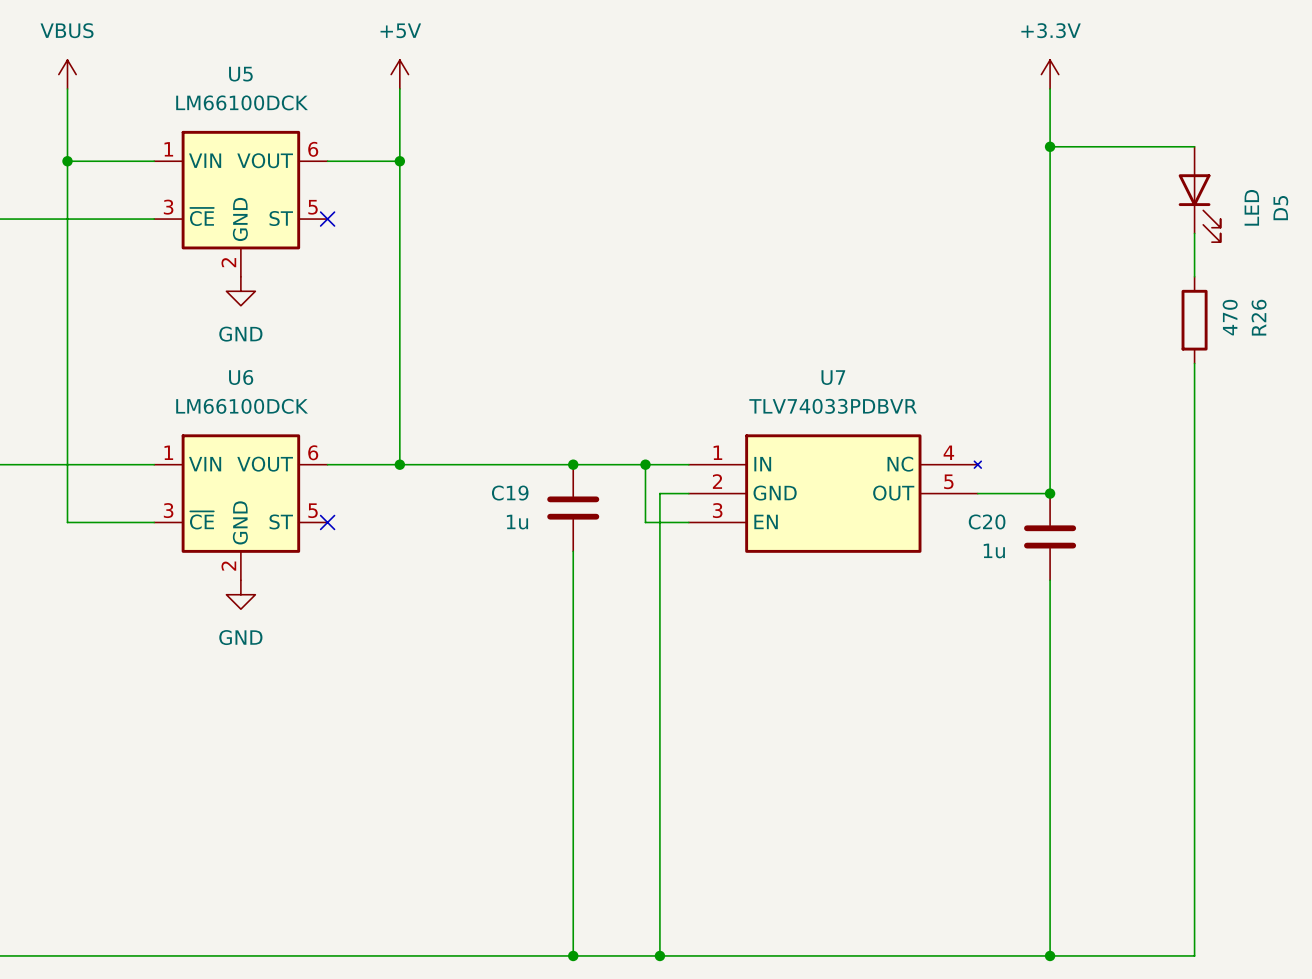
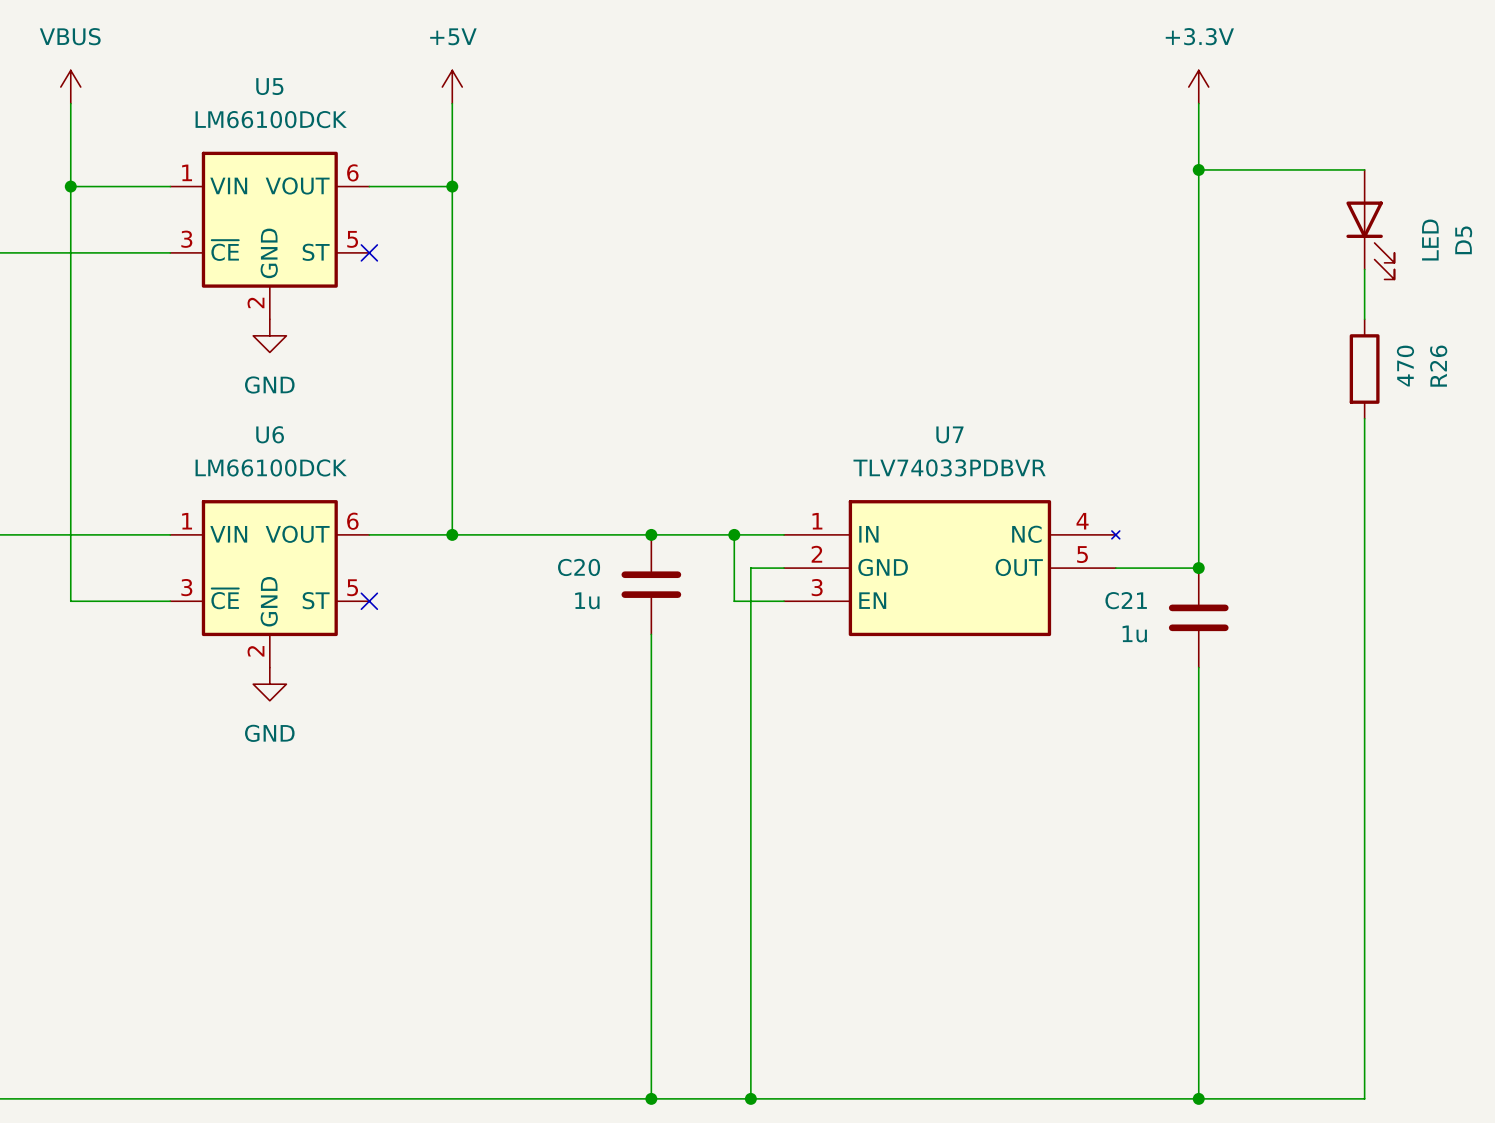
C19 name: C19 (510, 493) -> C20 (579, 567)
C20 name: C20 (987, 521) -> C21 (1126, 600)

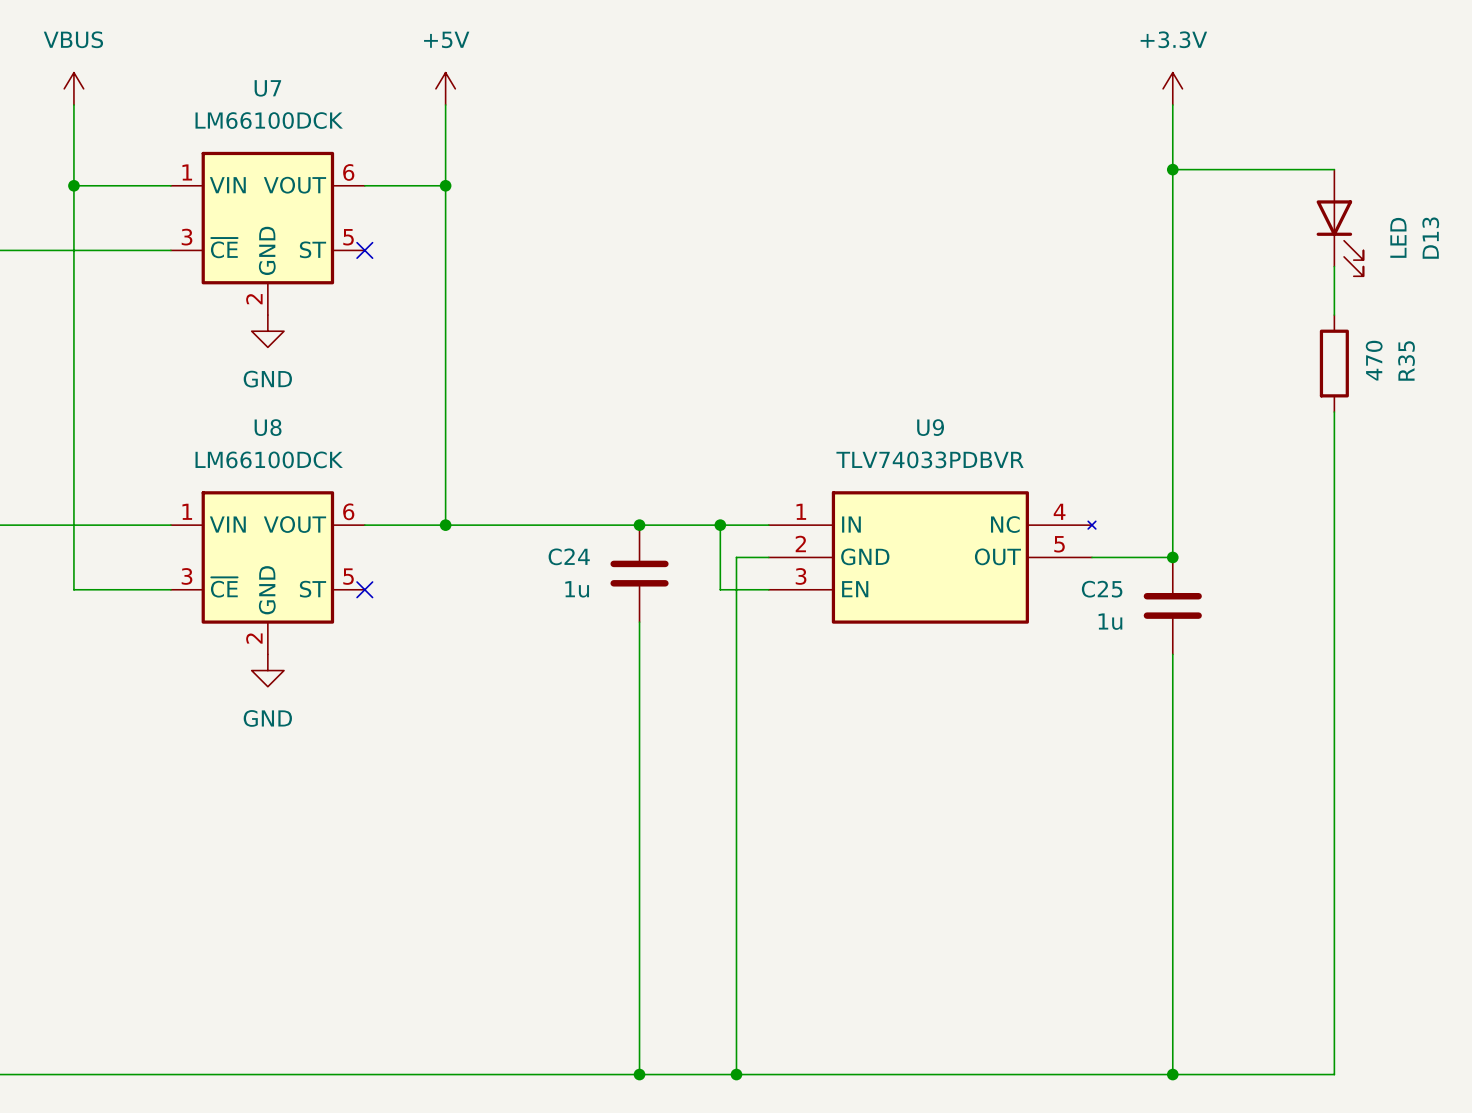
U5 name: U5 (269, 86) -> U7 (267, 88)
D5 name: D5 (1463, 240) -> D13 (1430, 238)
R26 name: R26 (1438, 366) -> R35 (1406, 360)
U6 name: U6 (270, 434) -> U8 (268, 427)
U7 name: U7 (949, 434) -> U9 (930, 427)
C20 name: C20 (579, 567) -> C24 (569, 556)
C21 name: C21 (1126, 600) -> C25 (1102, 589)

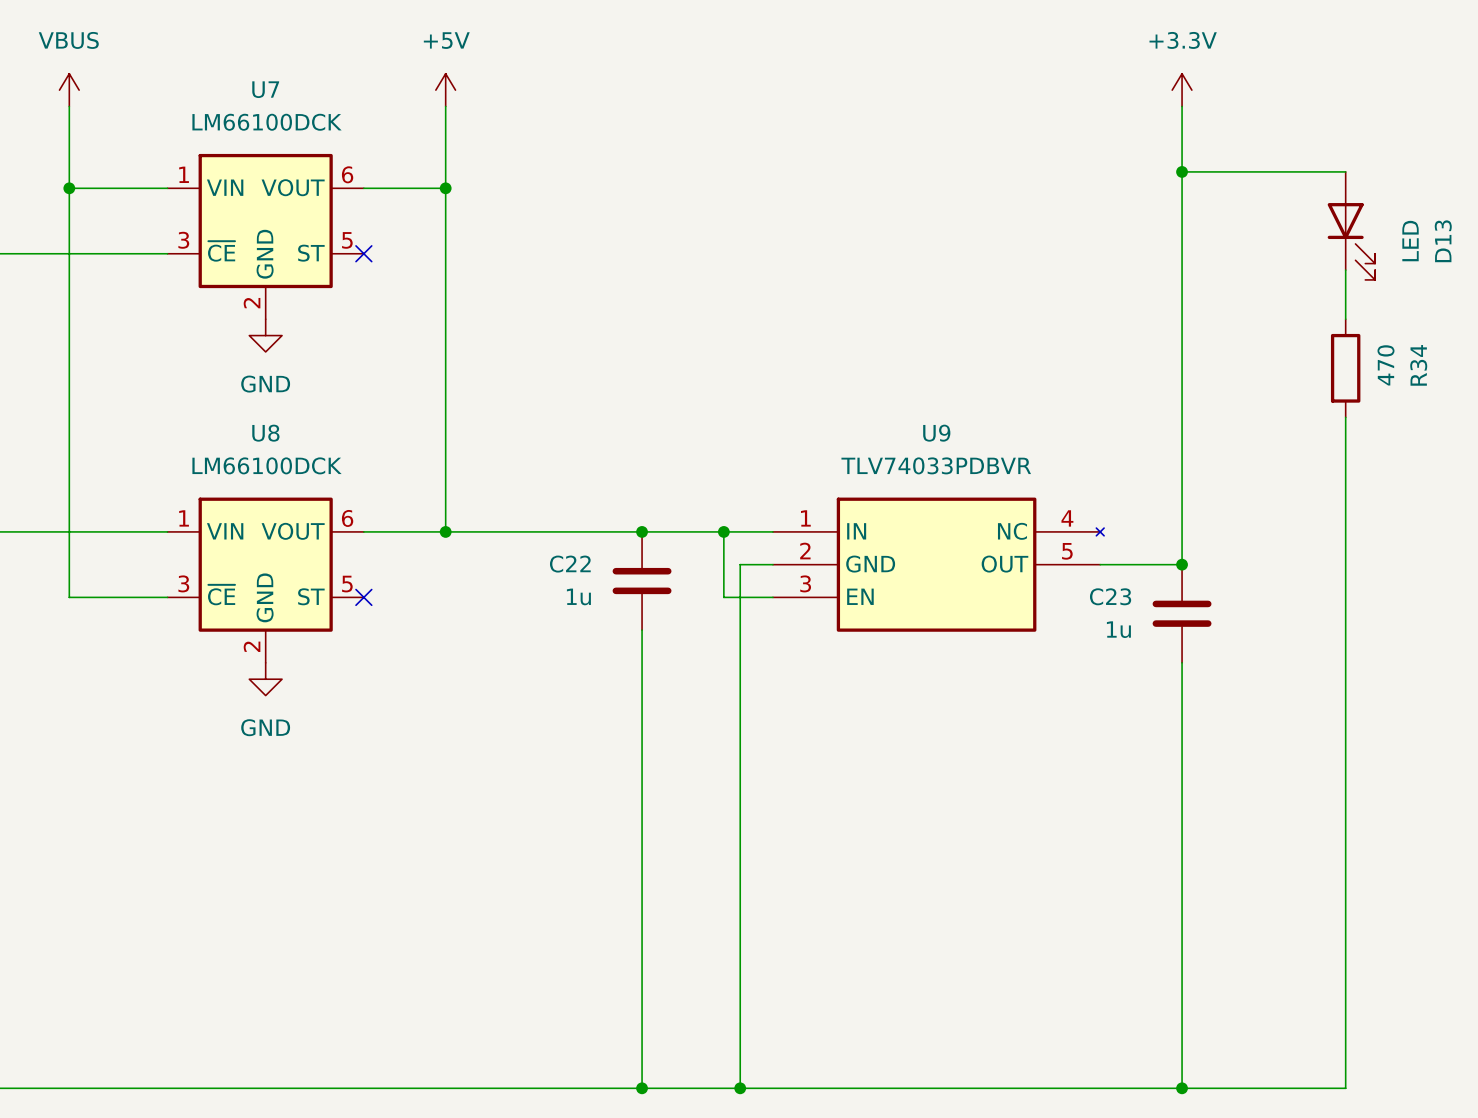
R35 name: R35 (1406, 360) -> R34 (1418, 365)
C24 name: C24 (569, 556) -> C22 (570, 564)
C25 name: C25 (1102, 589) -> C23 (1110, 596)

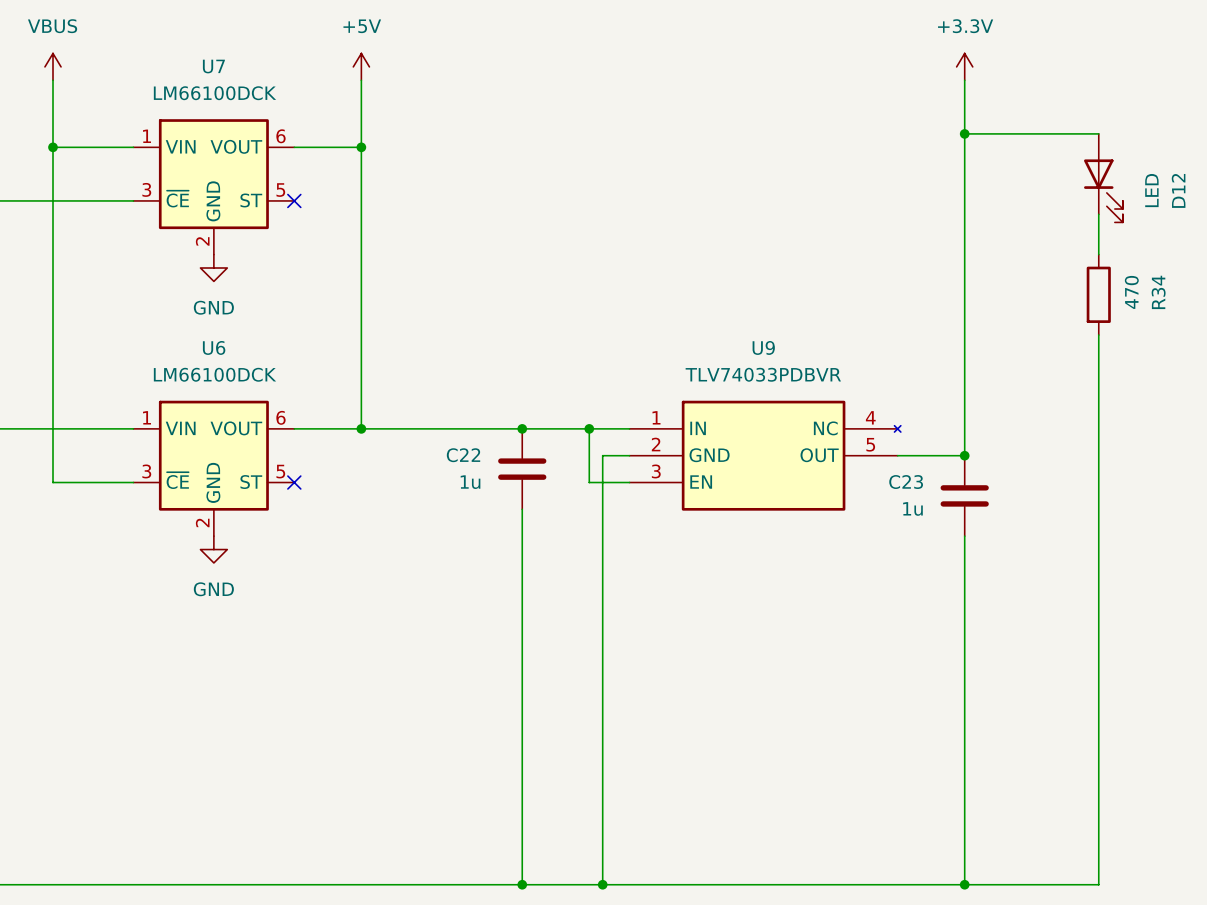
D13 name: D13 (1443, 241) -> D12 (1178, 190)
U8 name: U8 (265, 433) -> U6 (214, 347)

